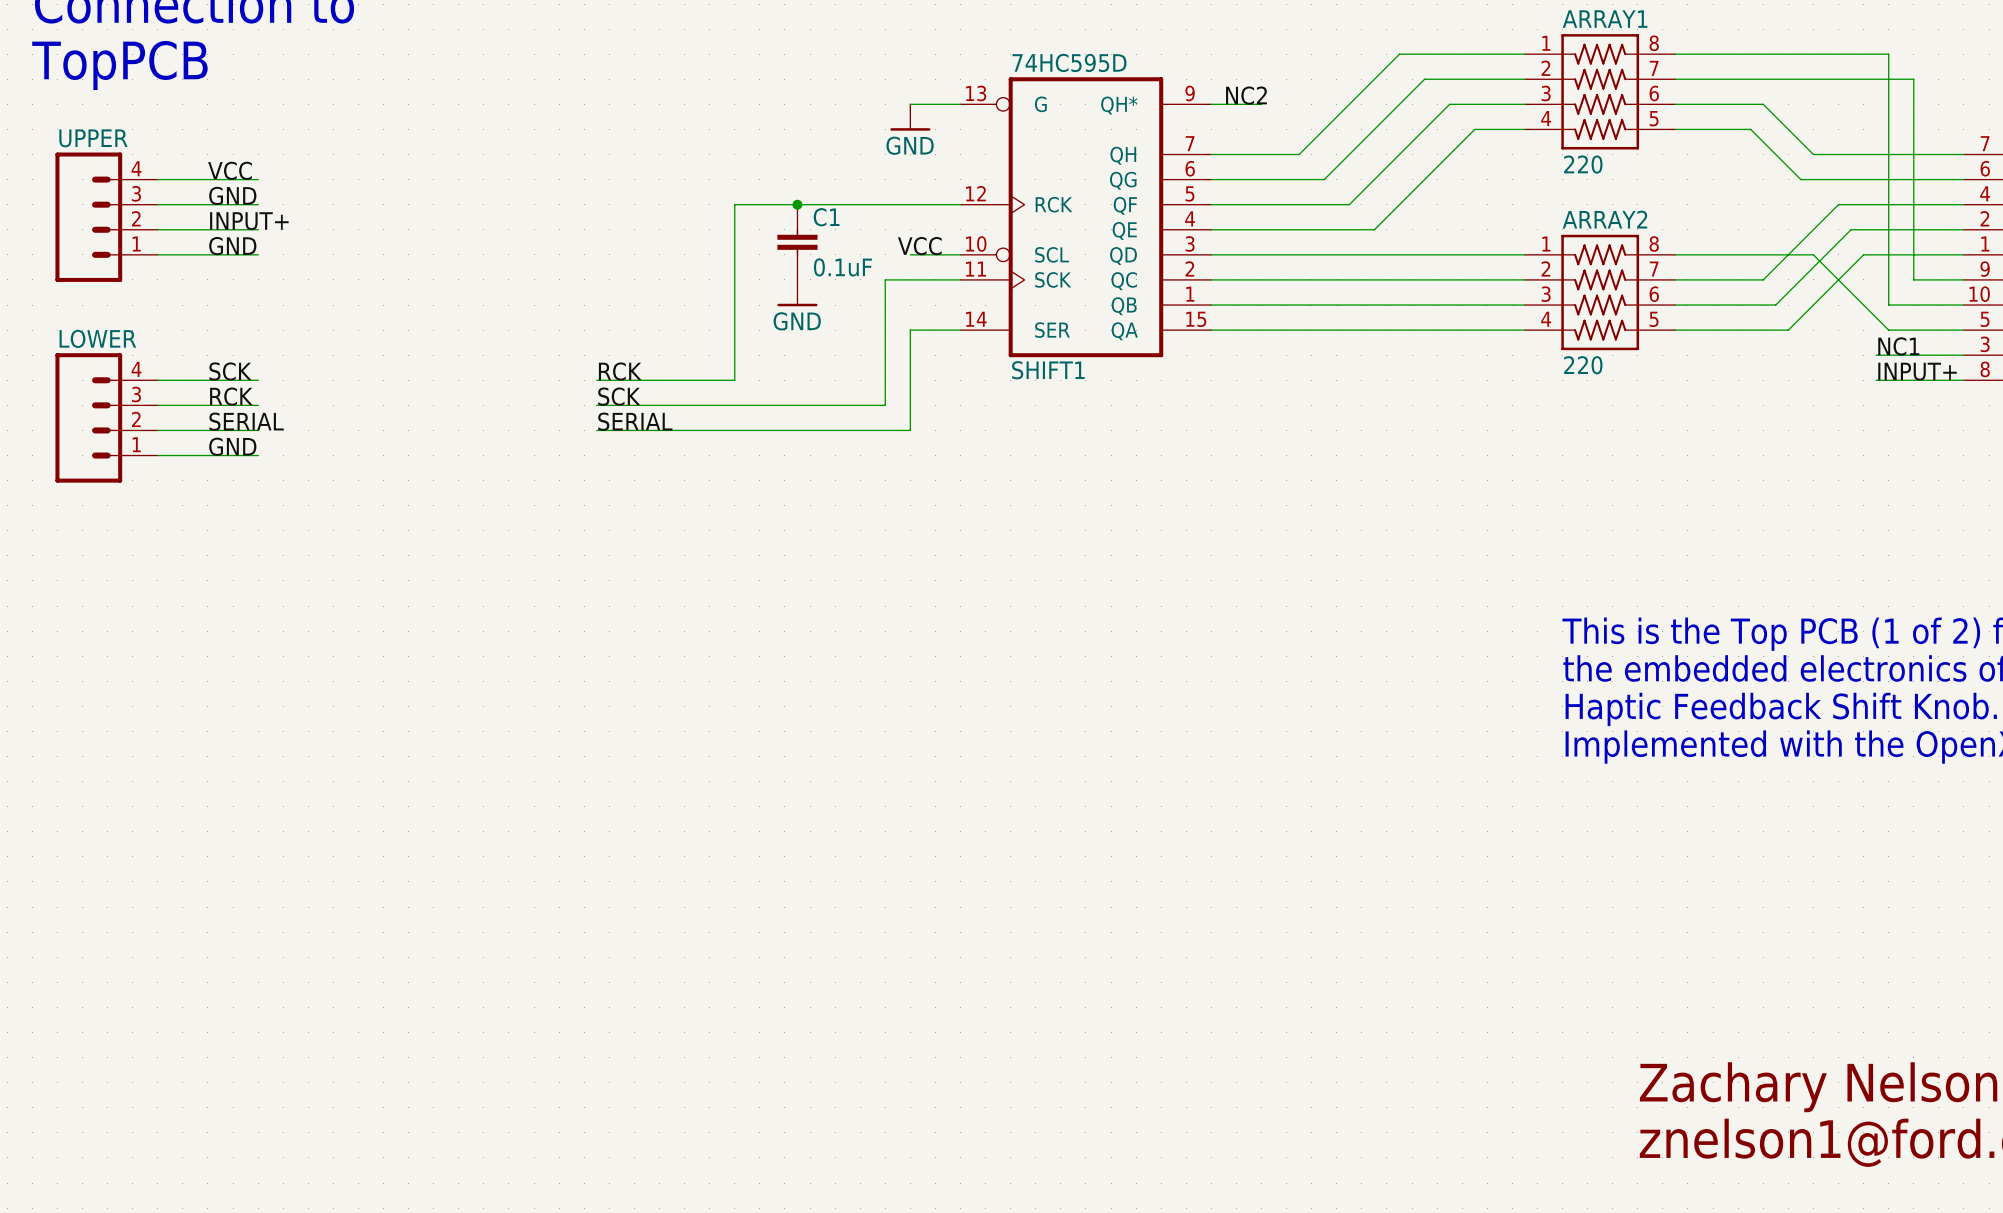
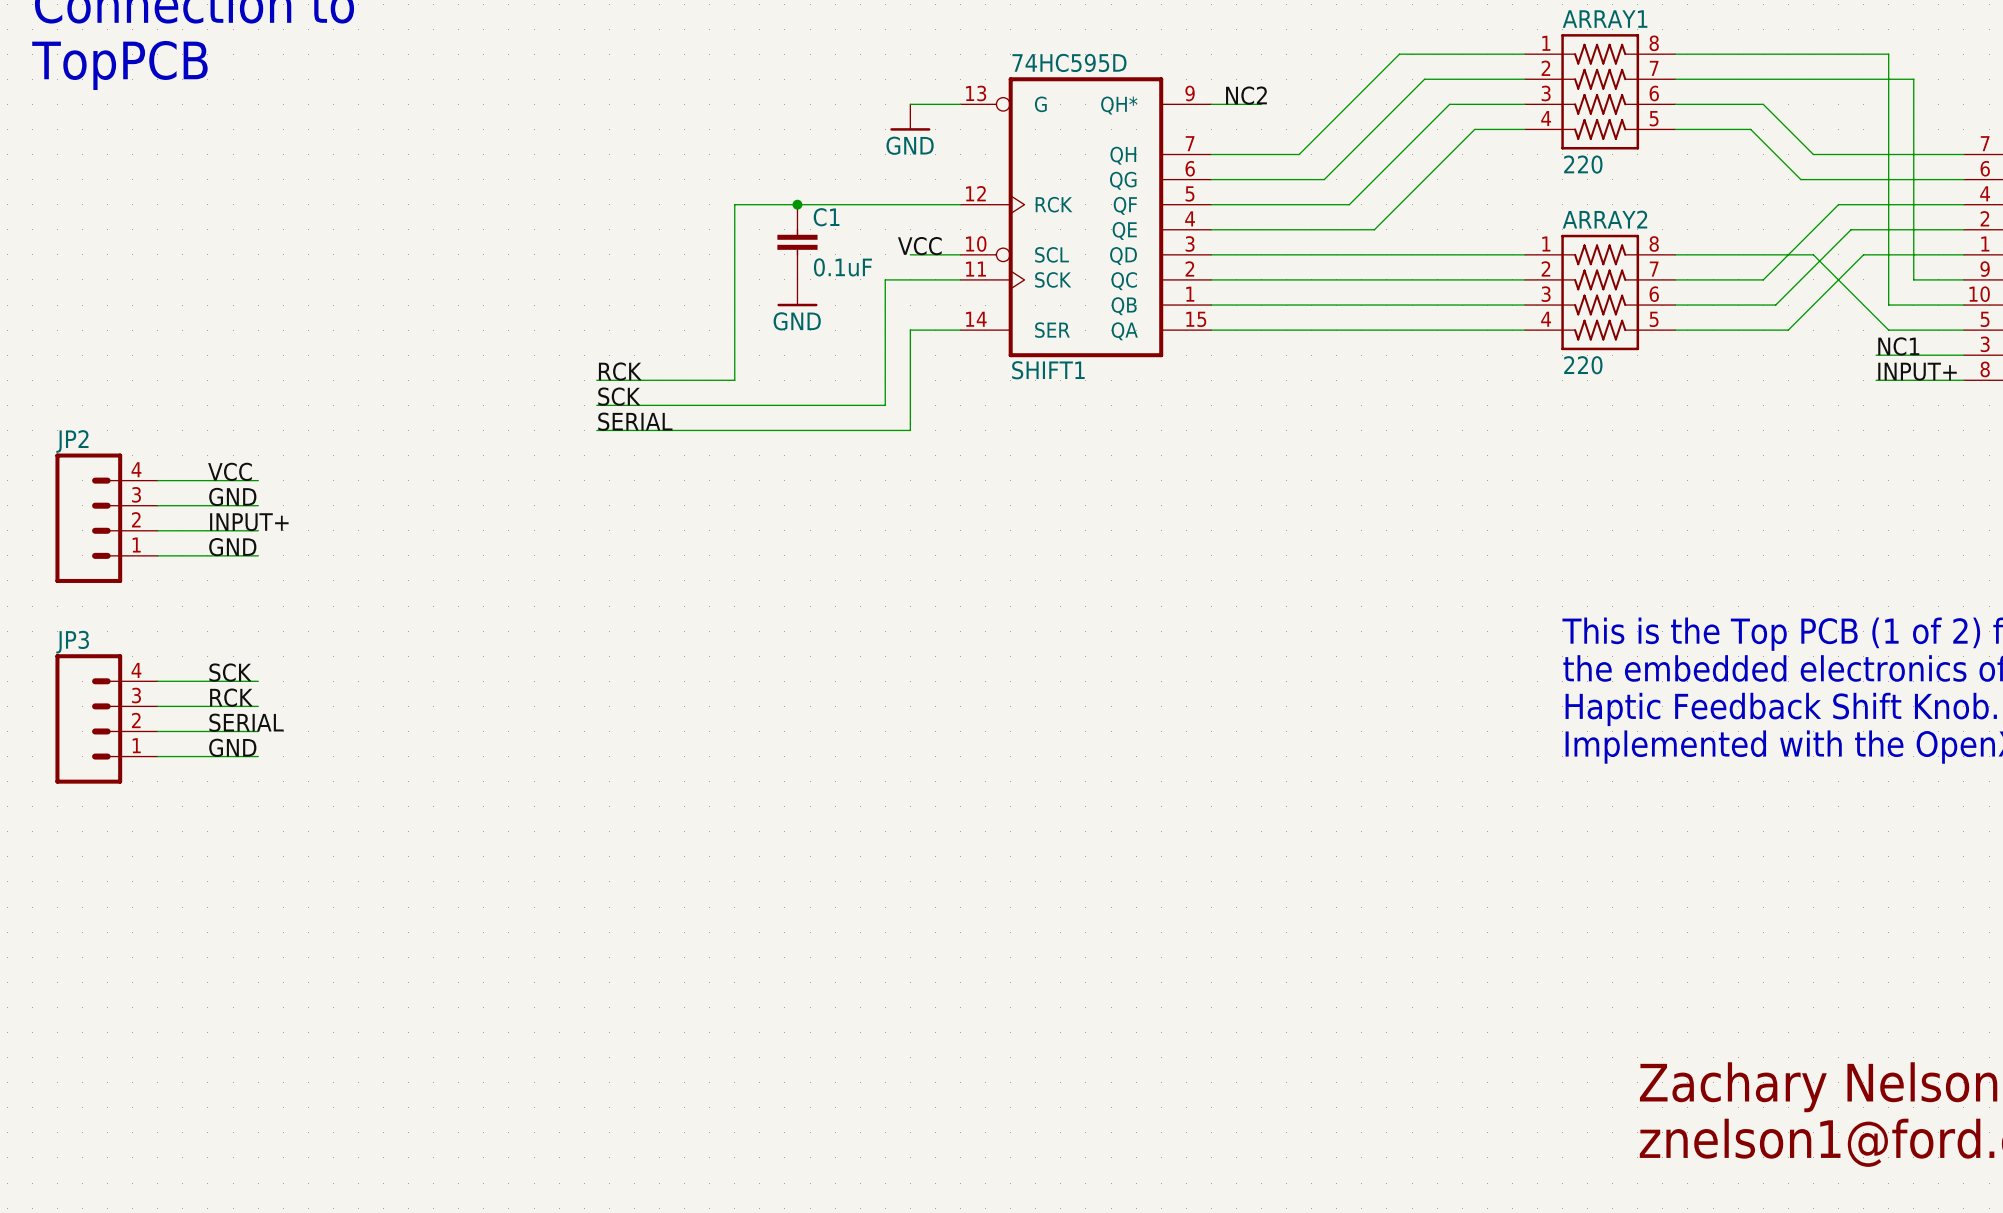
label: VCC (230, 170) -> none
wire: (157, 179) (258, 179) -> none
label: GND (232, 195) -> none
wire: (157, 204) (258, 204) -> none
UPPER: (106, 217) -> none
label: INPUT+ (249, 221) -> none
wire: (157, 229) (258, 229) -> none
label: GND (232, 246) -> none
wire: (157, 254) (258, 254) -> none
label: SCK (230, 371) -> none
wire: (157, 380) (258, 380) -> (157, 480) (258, 480)
label: RCK (231, 396) -> none
wire: (157, 405) (258, 405) -> (157, 505) (258, 505)
LOWER: (106, 417) -> none
label: SERIAL (246, 421) -> none
wire: (157, 430) (258, 430) -> (157, 530) (258, 530)
label: GND (232, 446) -> none
wire: (157, 455) (258, 455) -> (157, 555) (258, 555)
label: none -> VCC (230, 471)
label: none -> GND (232, 496)
JP2: none -> (106, 518)
label: none -> INPUT+ (249, 522)
label: none -> GND (232, 547)
label: none -> SCK (230, 672)
wire: none -> (157, 681) (258, 681)
label: none -> RCK (231, 697)
wire: none -> (157, 706) (258, 706)
JP3: none -> (106, 718)
label: none -> SERIAL (246, 722)
wire: none -> (157, 731) (258, 731)
label: none -> GND (232, 747)
wire: none -> (157, 756) (258, 756)

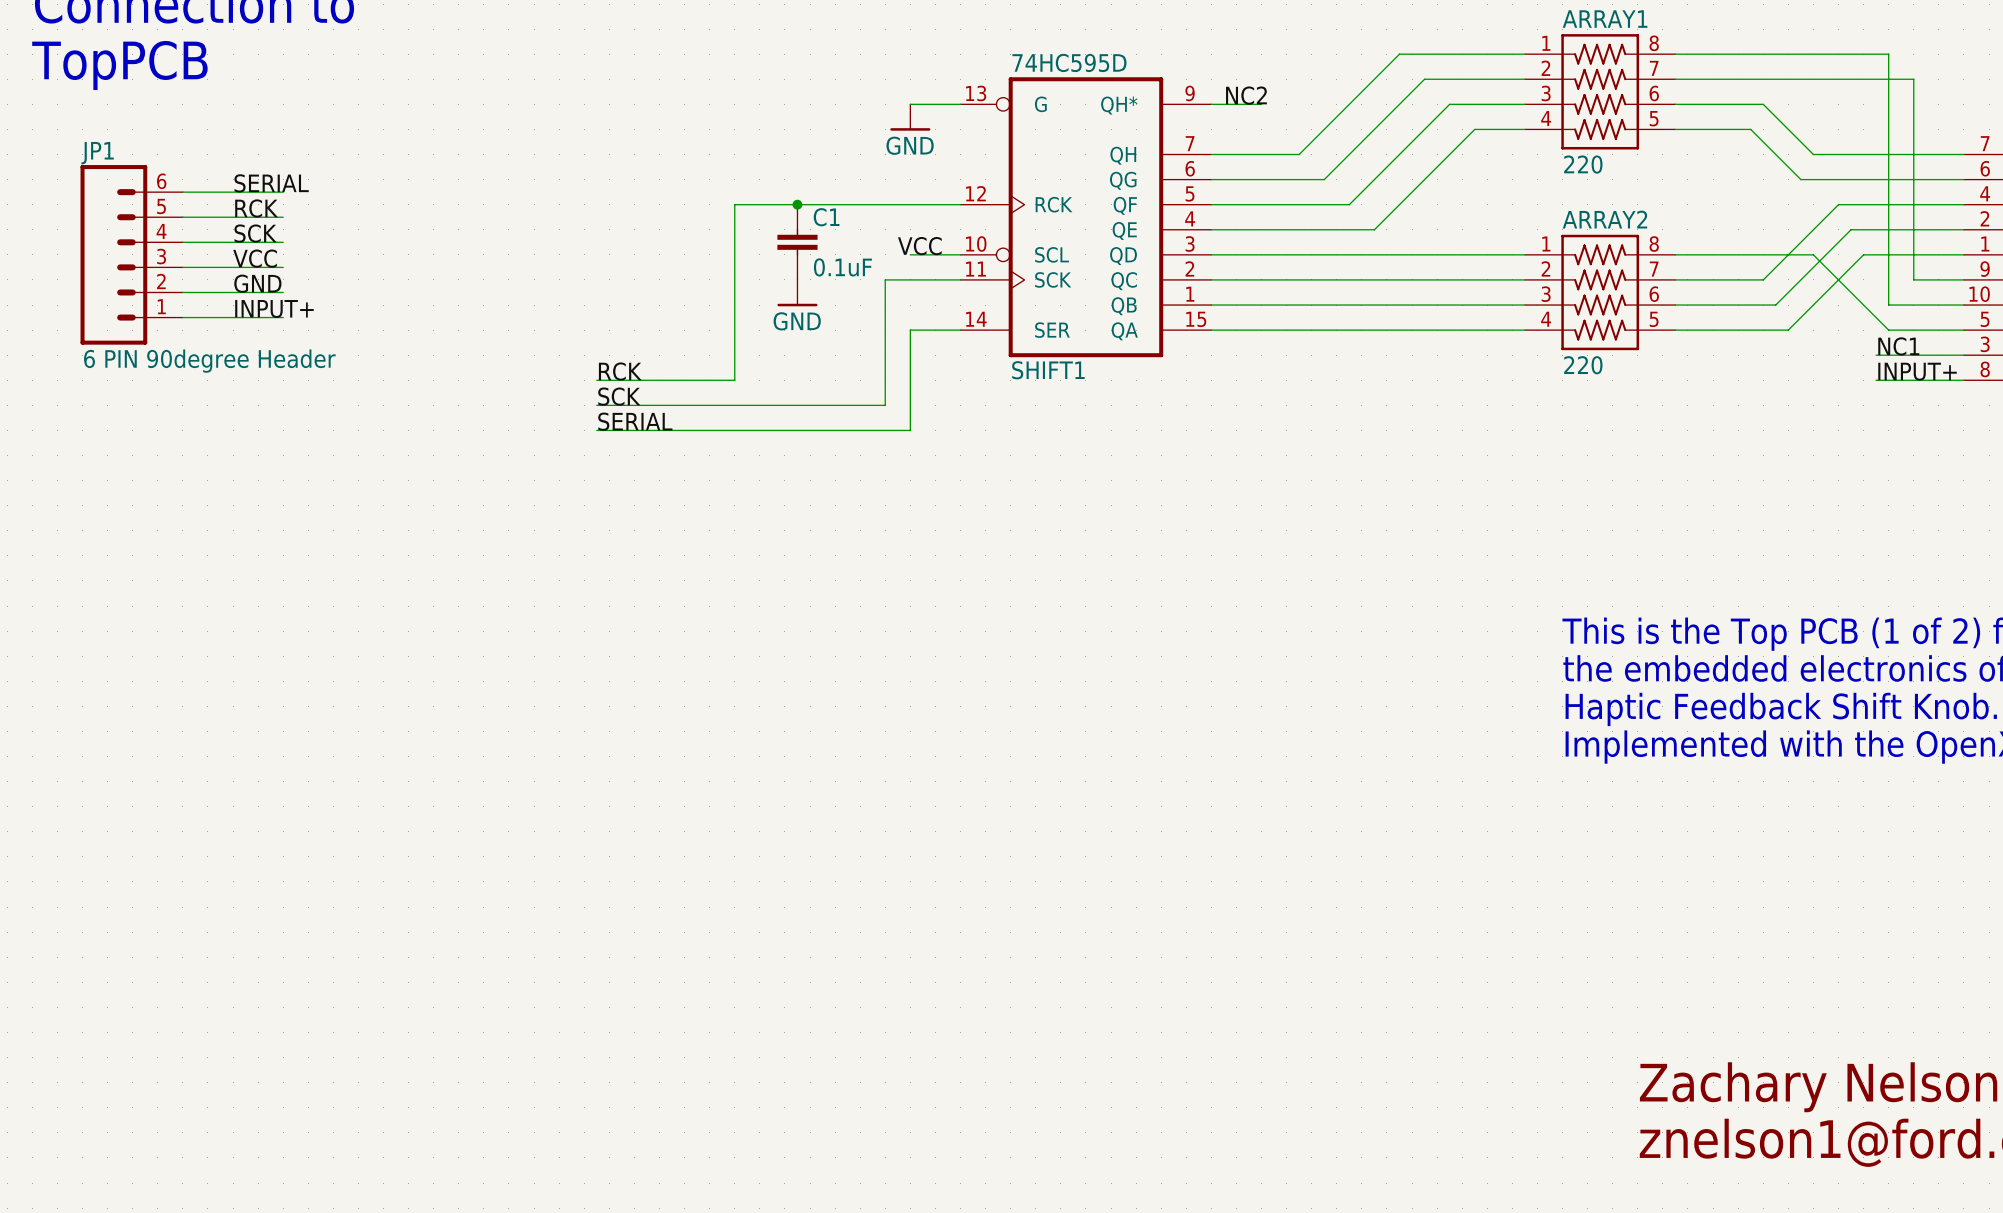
label: none -> SERIAL (271, 183)
wire: none -> (182, 192) (283, 192)
label: none -> RCK (256, 208)
wire: none -> (182, 217) (283, 217)
label: none -> SCK (255, 233)
JP1: none -> 6 PIN 90degree Header (131, 254)
label: none -> GND (257, 283)
label position: VCC (230, 471) -> VCC (255, 258)
wire: (157, 480) (258, 480) -> (182, 242) (283, 242)
label: GND (232, 496) -> none
wire: (157, 505) (258, 505) -> (182, 267) (283, 267)
JP2: (106, 518) -> none
label position: INPUT+ (249, 522) -> INPUT+ (274, 308)
wire: (157, 530) (258, 530) -> (182, 292) (283, 292)
label: GND (232, 547) -> none
wire: (157, 555) (258, 555) -> (182, 317) (283, 317)
label: SCK (230, 672) -> none
wire: (157, 681) (258, 681) -> none
label: RCK (231, 697) -> none
wire: (157, 706) (258, 706) -> none
JP3: (106, 718) -> none
label: SERIAL (246, 722) -> none
wire: (157, 731) (258, 731) -> none
label: GND (232, 747) -> none
wire: (157, 756) (258, 756) -> none

